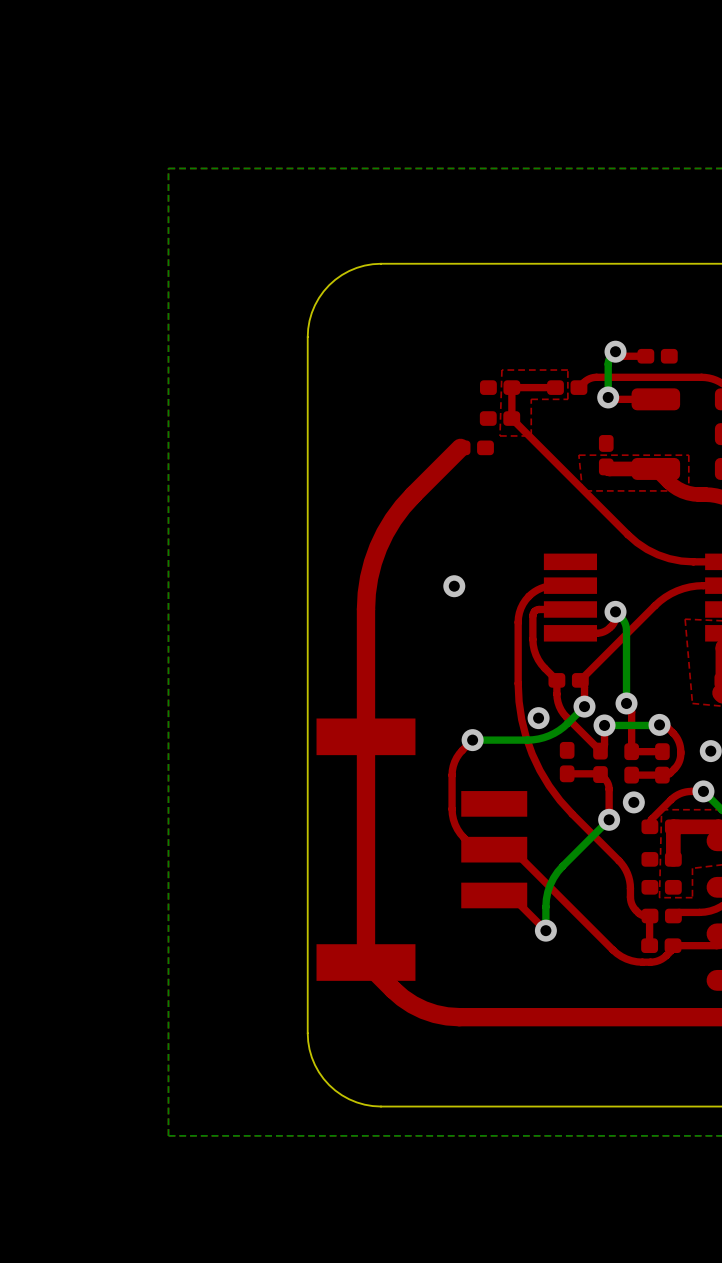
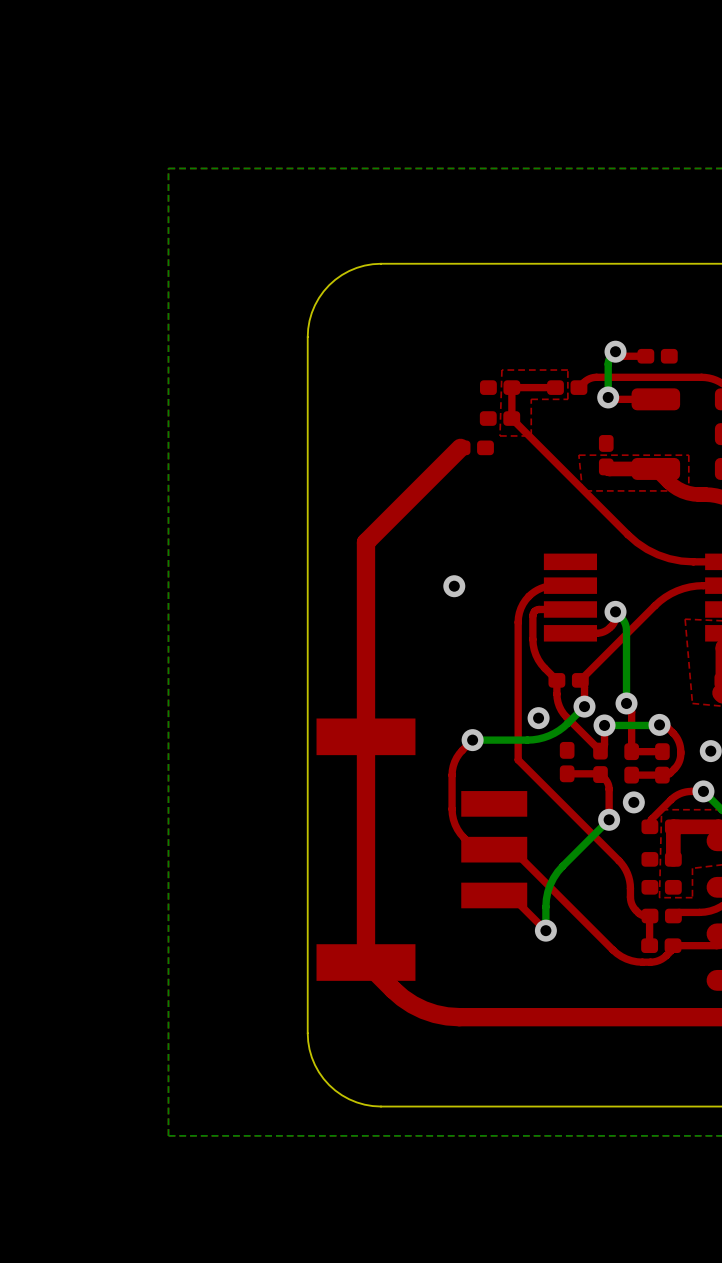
top track: (413, 495) (393, 519) (378, 547) (369, 577) (365, 609) -> (413, 495) (365, 542) (365, 609)
top track: (518, 683) (521, 719) (532, 754) (549, 786) (572, 813) -> (518, 683) (518, 759) (572, 813)

